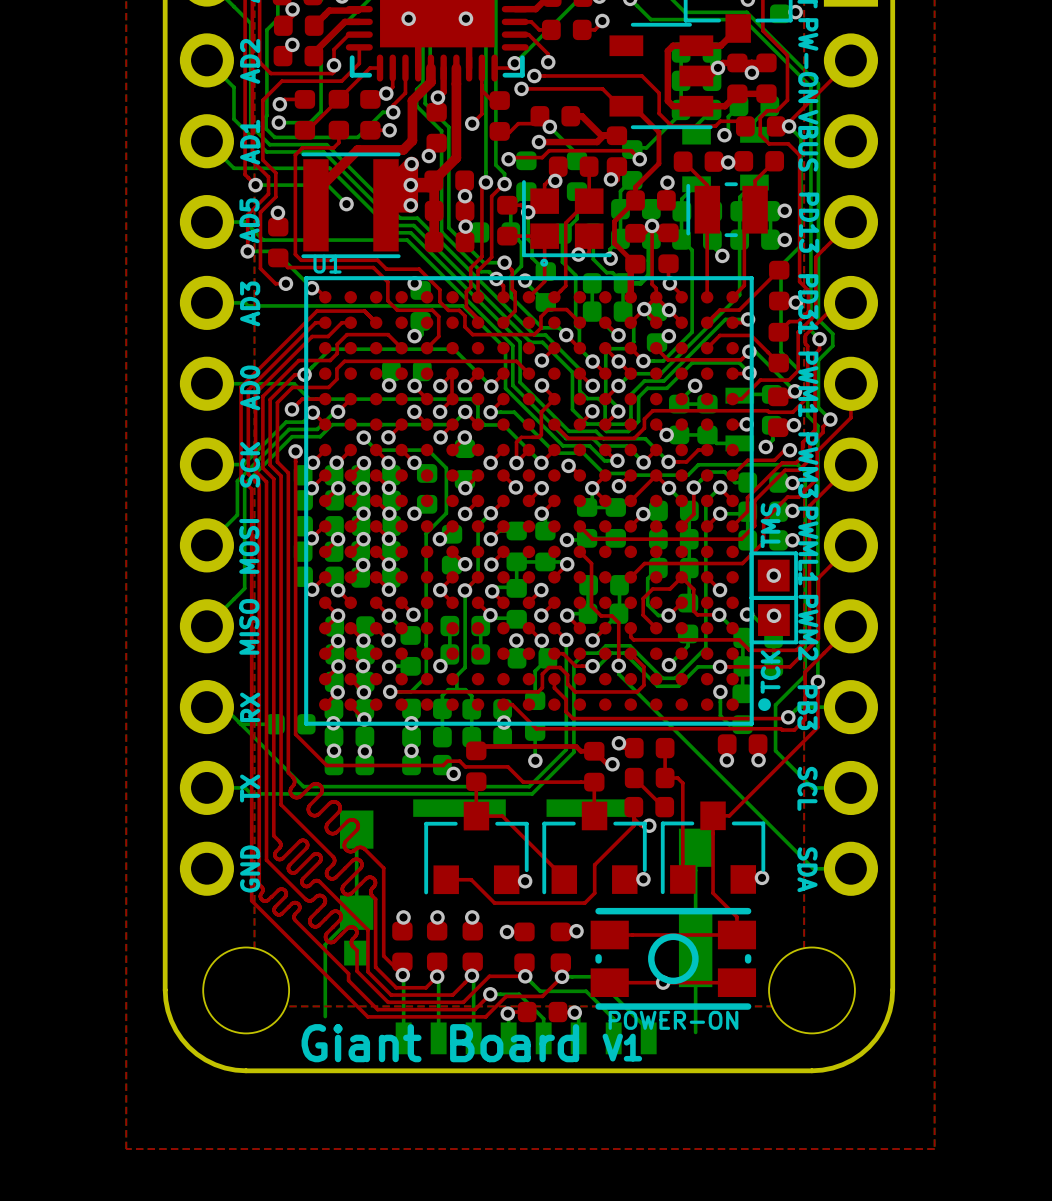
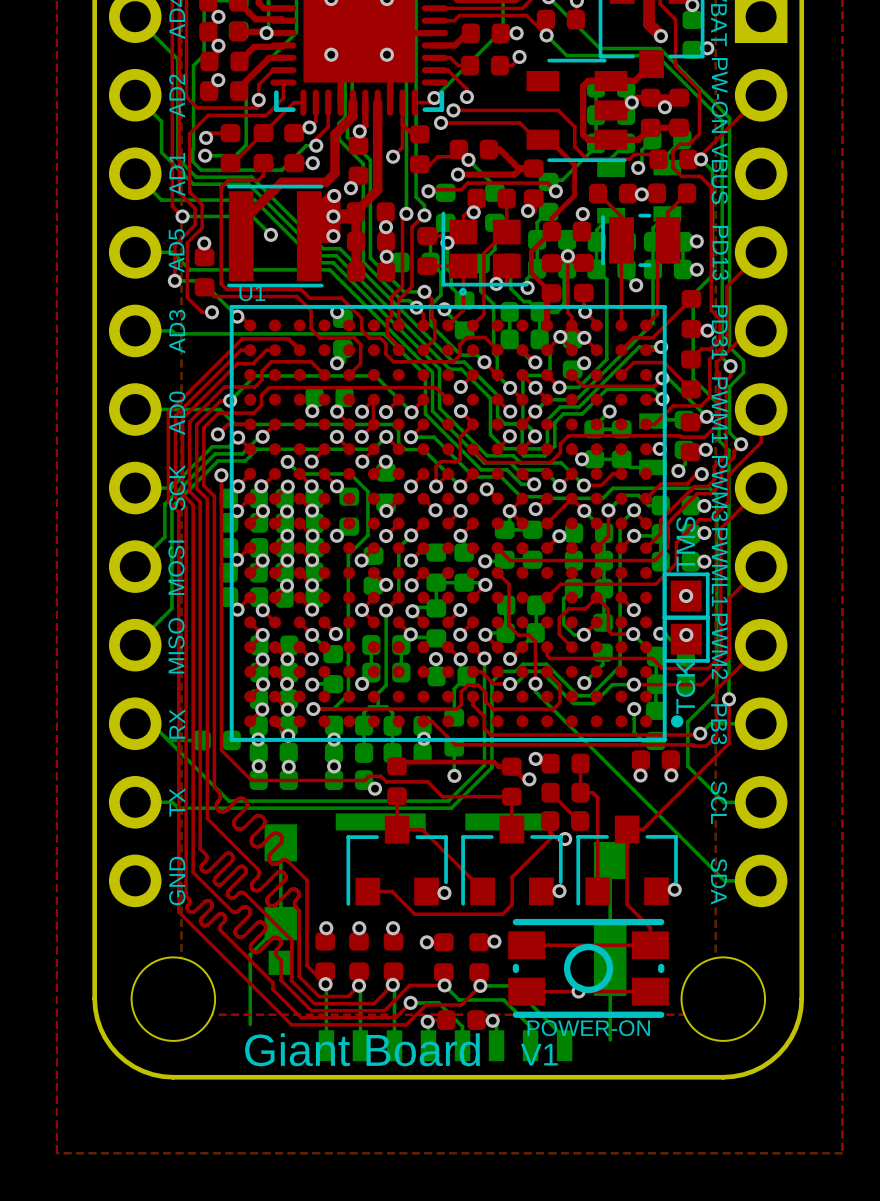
TMS name: none -> TMS (685, 544)
text: TMS (770, 525) -> none
TCK name: none -> TCK (685, 687)
text: TCK (770, 672) -> none

